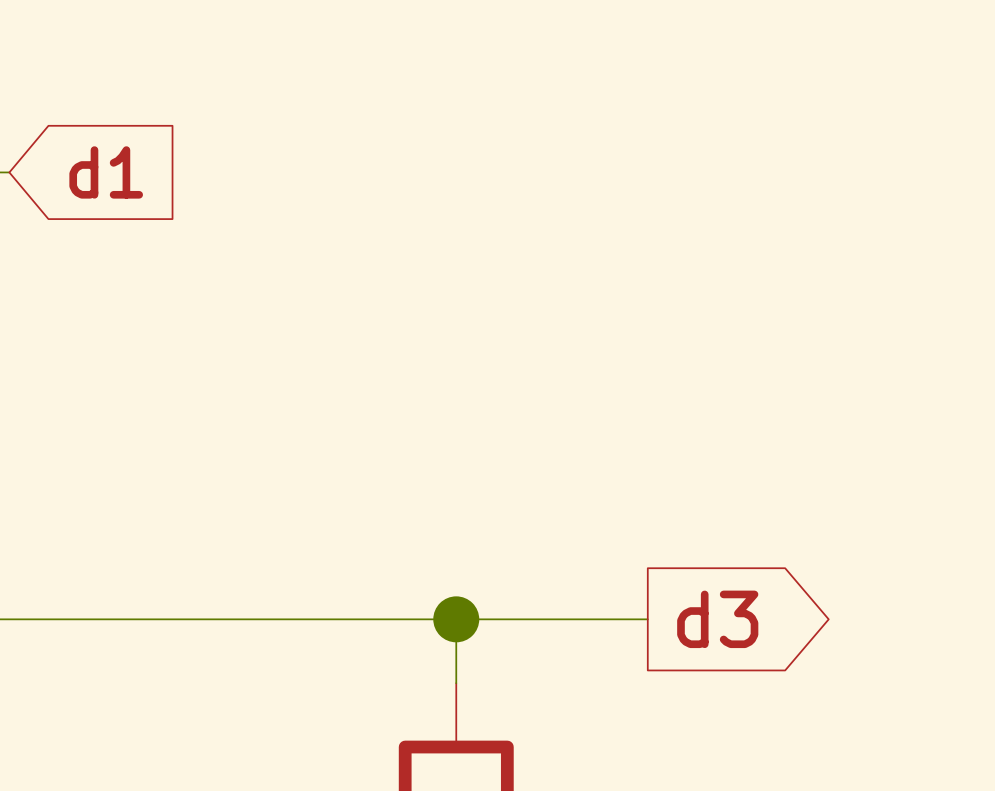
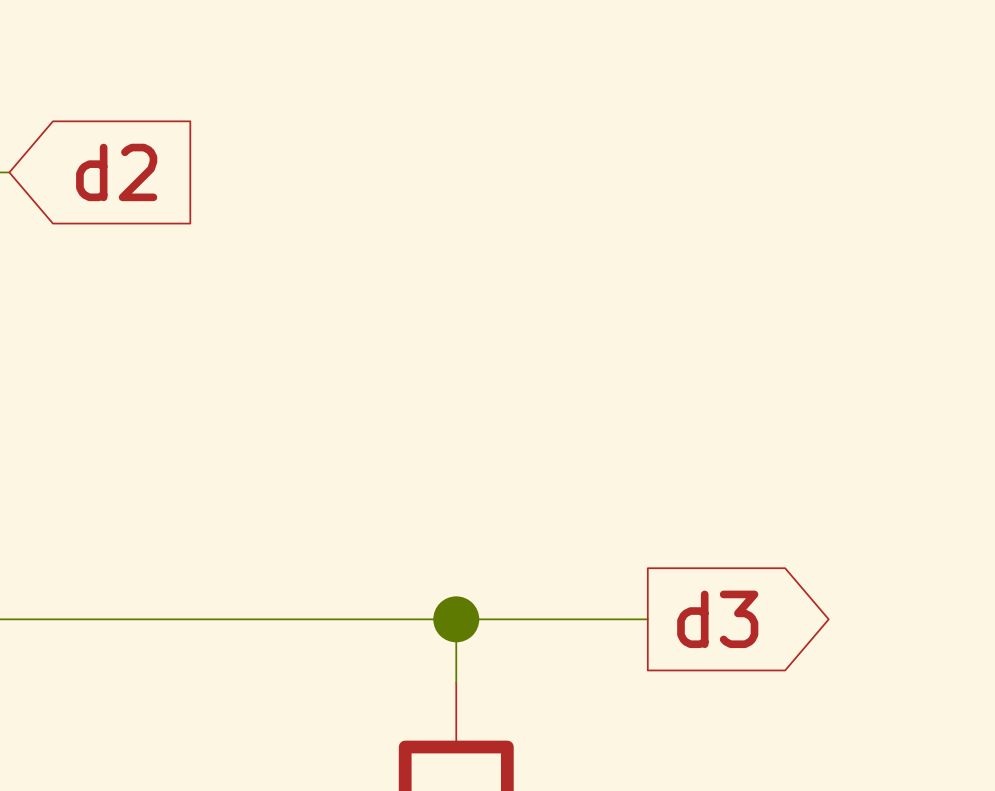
global label: d1 (106, 172) -> d2 (116, 172)

